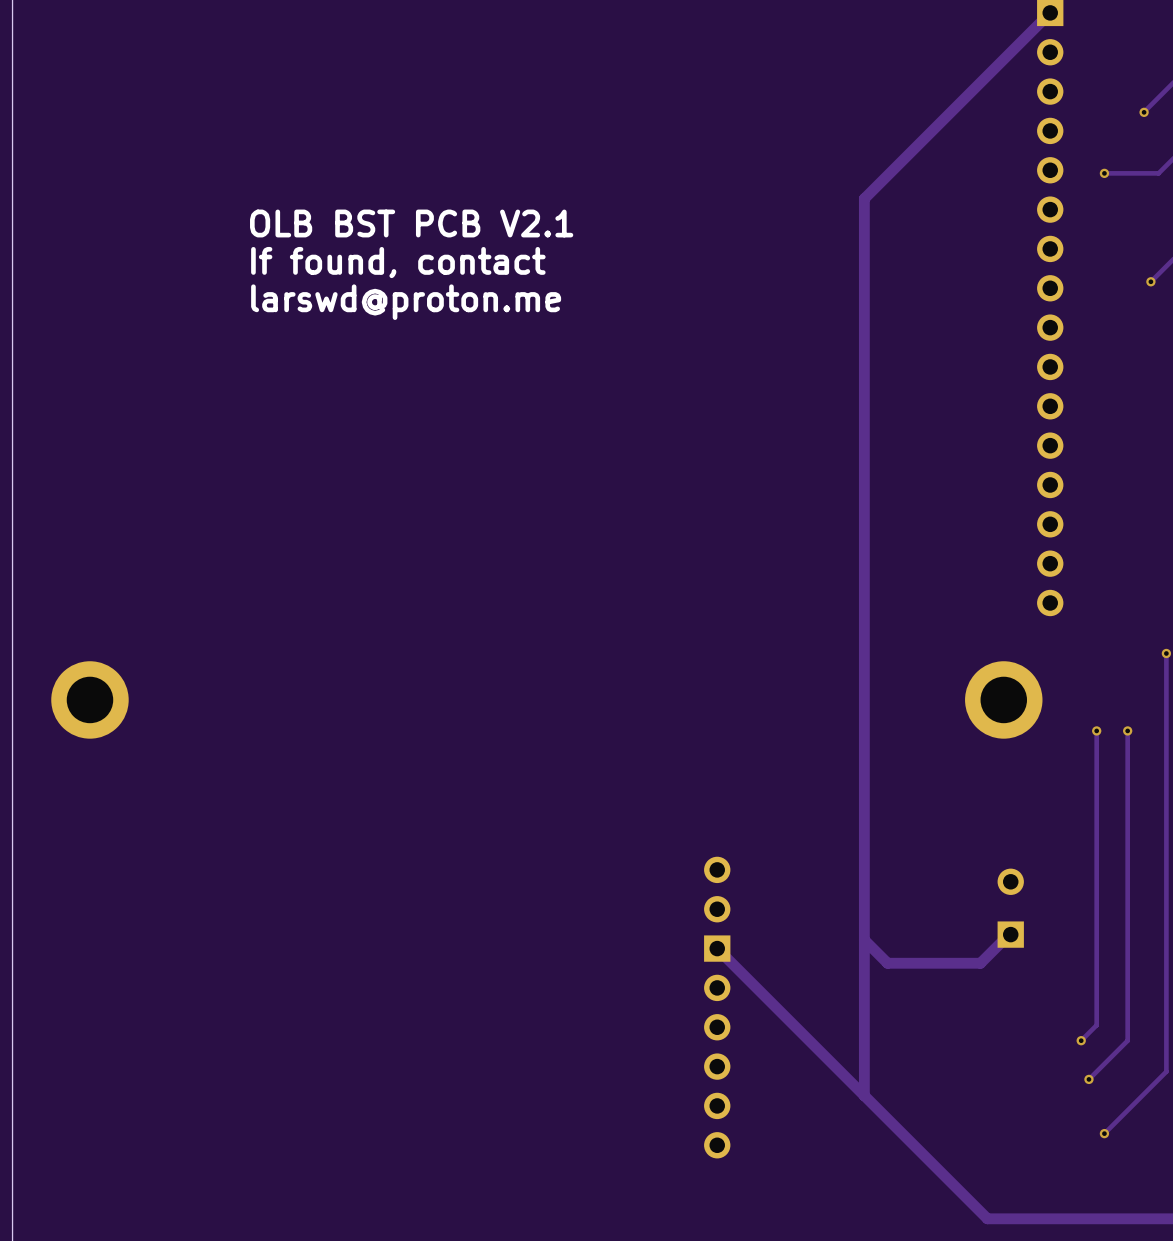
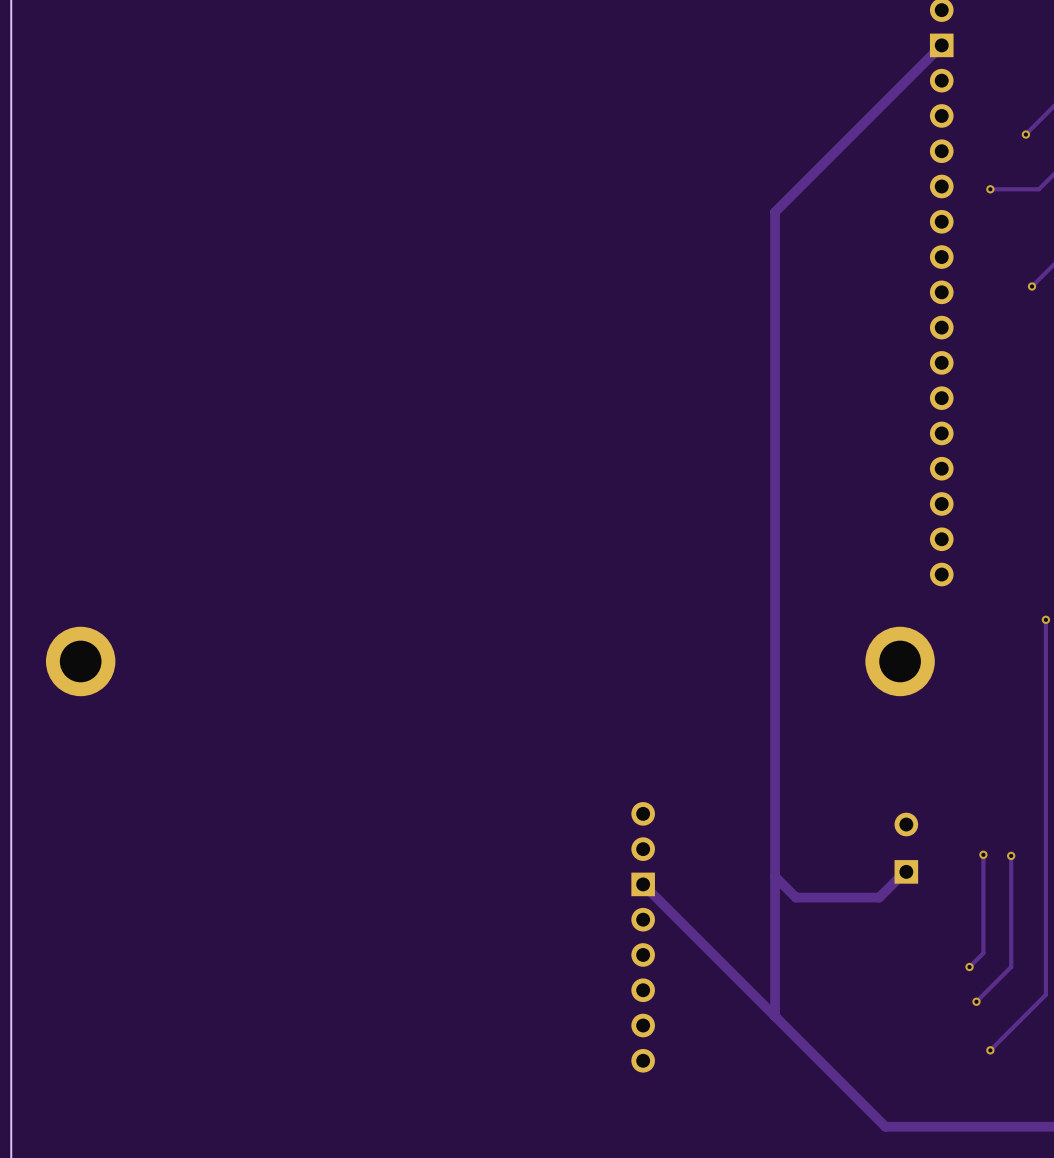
text: OLB BST PCB V2.1 (411, 223) -> none
text: If found, contact (398, 262) -> none
text: larswd@proton.me (406, 302) -> none
track: (1096, 730) (1096, 915) -> none
via: (1096, 730) -> none
track: (1127, 730) (1127, 916) -> none
via: (1127, 730) -> none
via: none -> (983, 854)
via: none -> (1011, 855)

